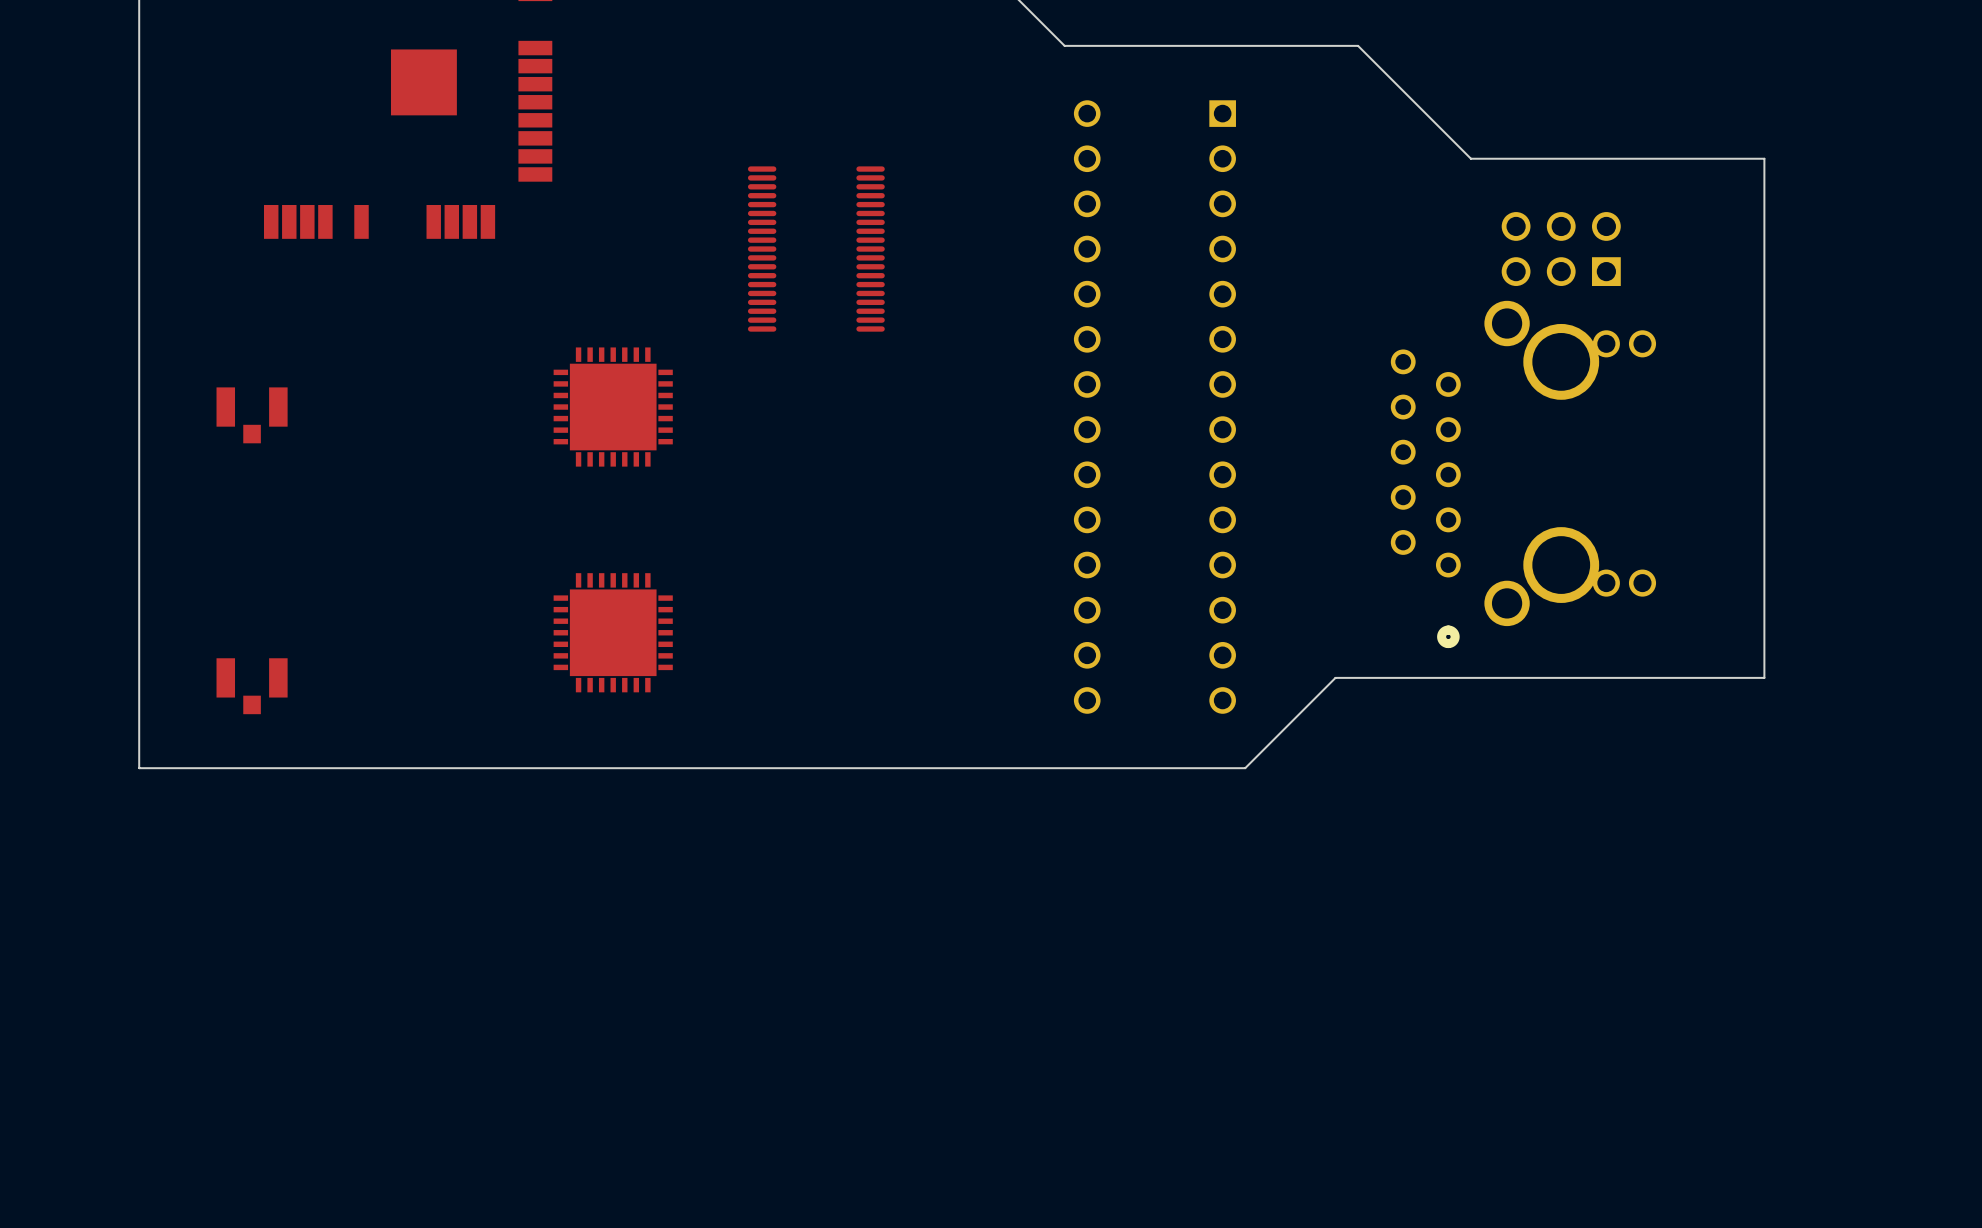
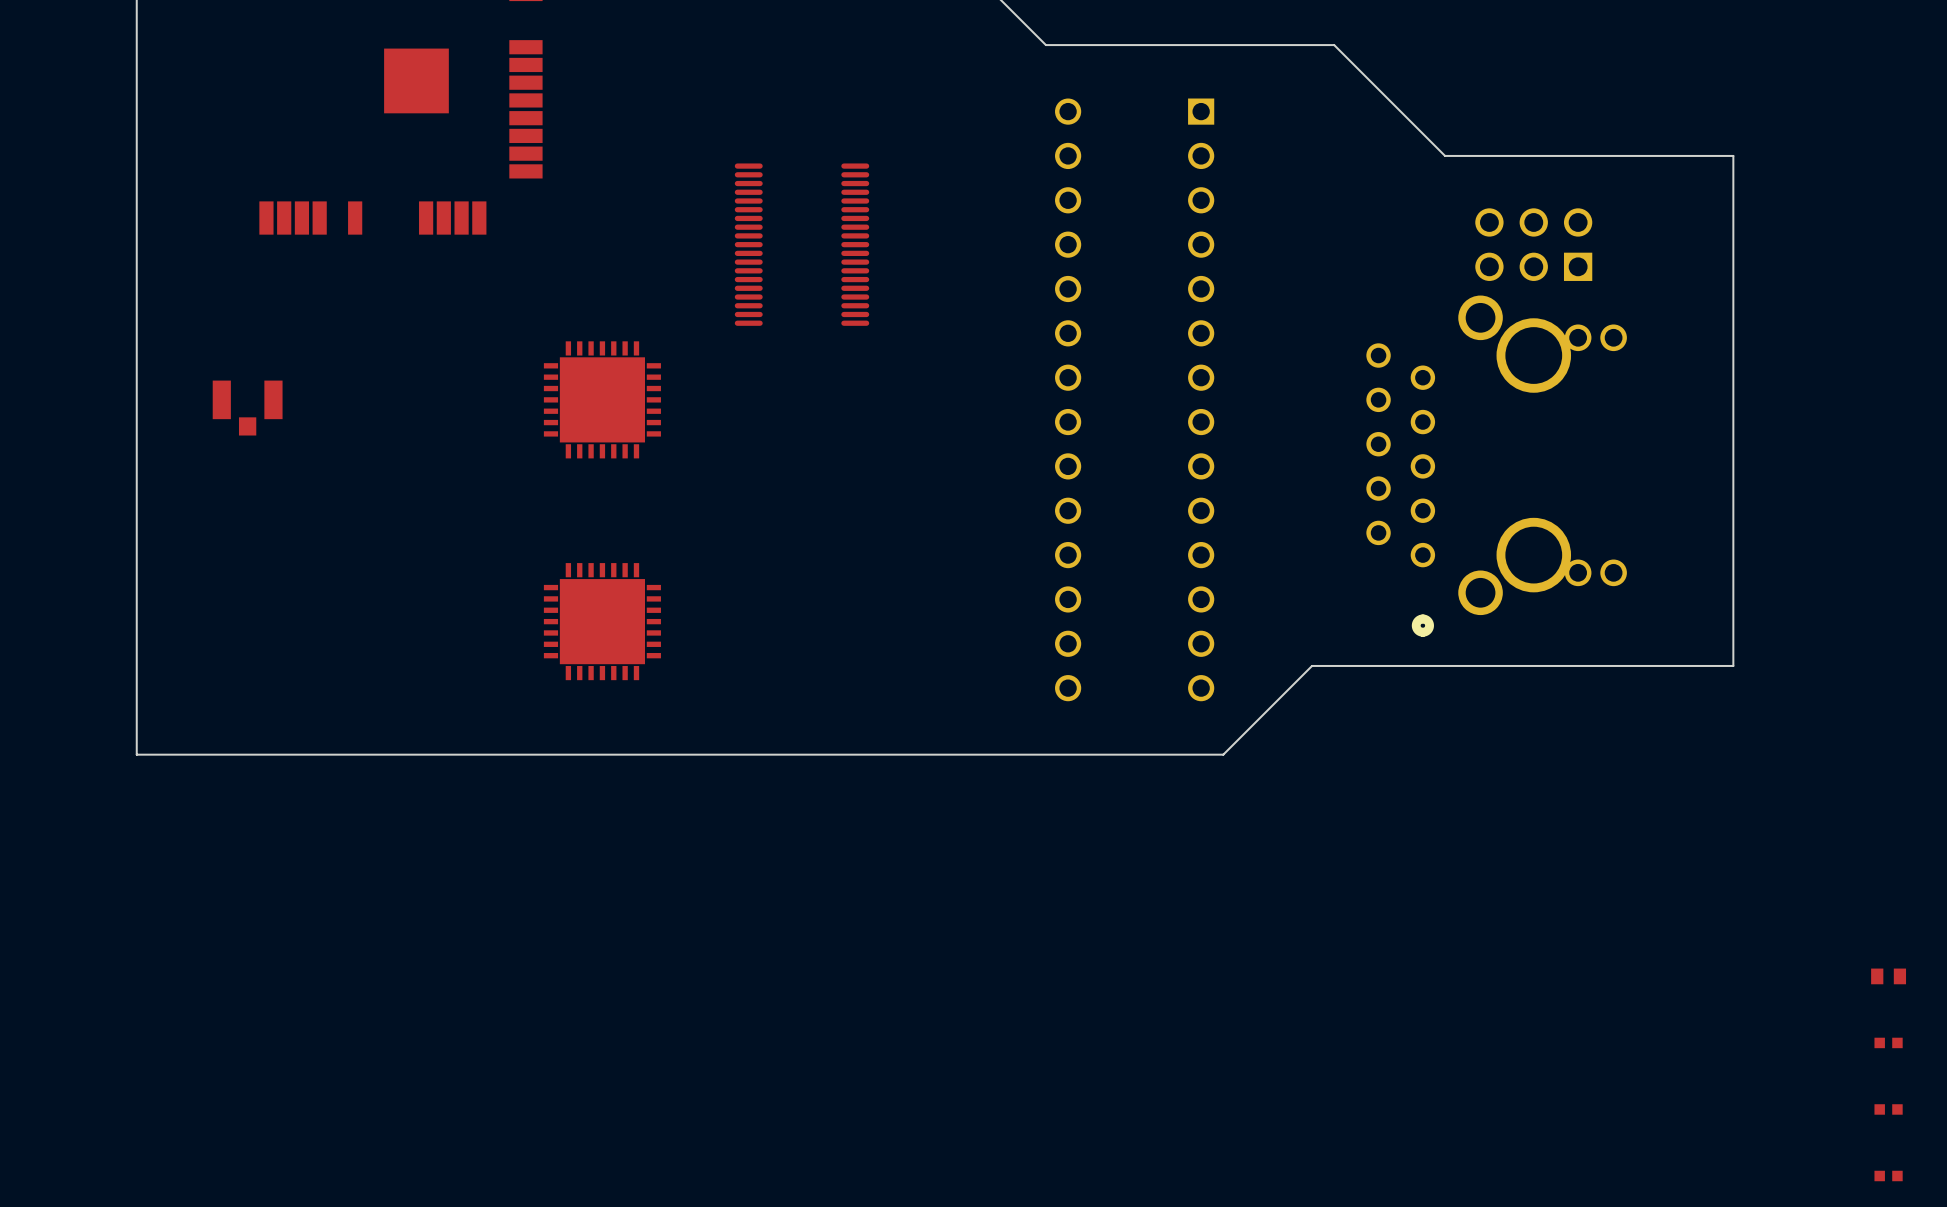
part: (252, 686) -> none
part: none -> (1888, 976)
part: none -> (1888, 1042)
part: none -> (1888, 1109)
part: none -> (1888, 1175)

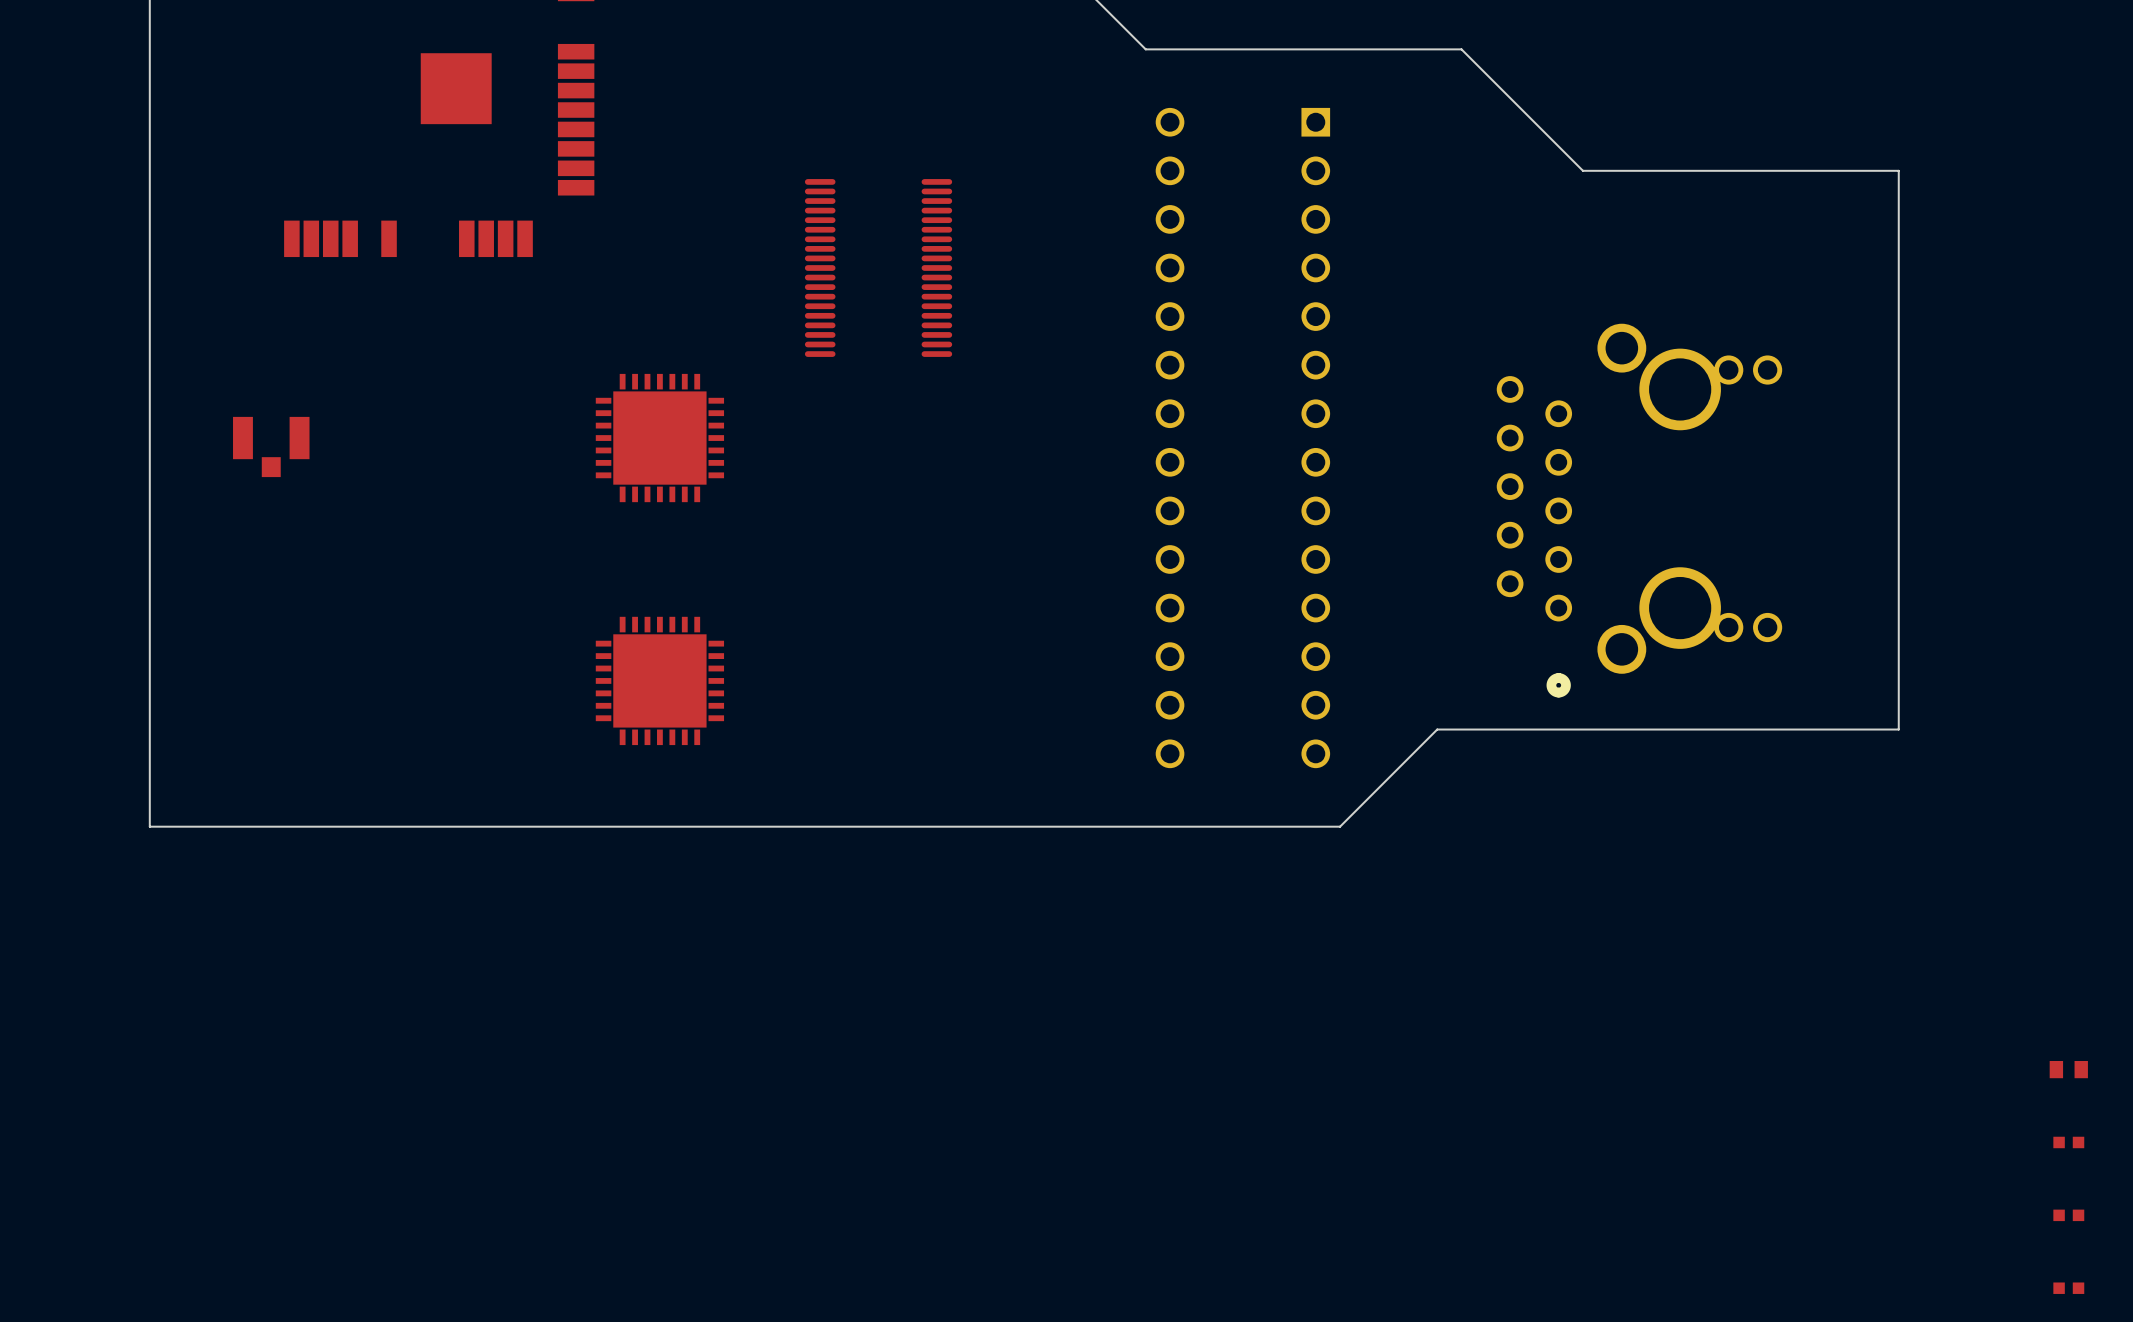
part: (1533, 244) -> none

